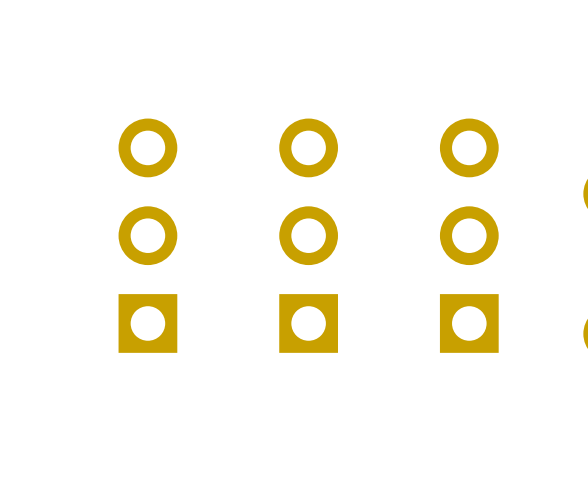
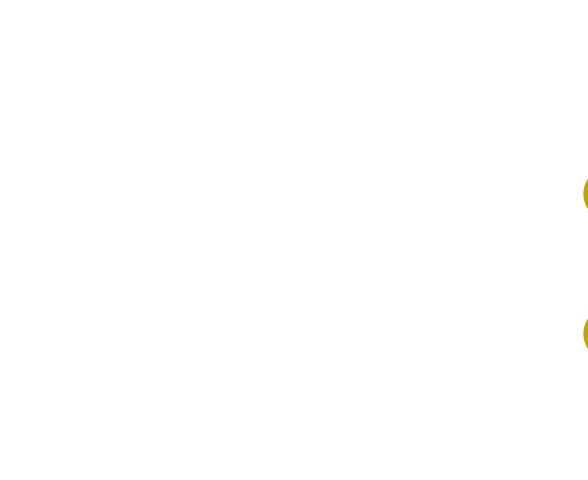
part: (147, 235) -> none
part: (308, 235) -> none
part: (469, 235) -> none

